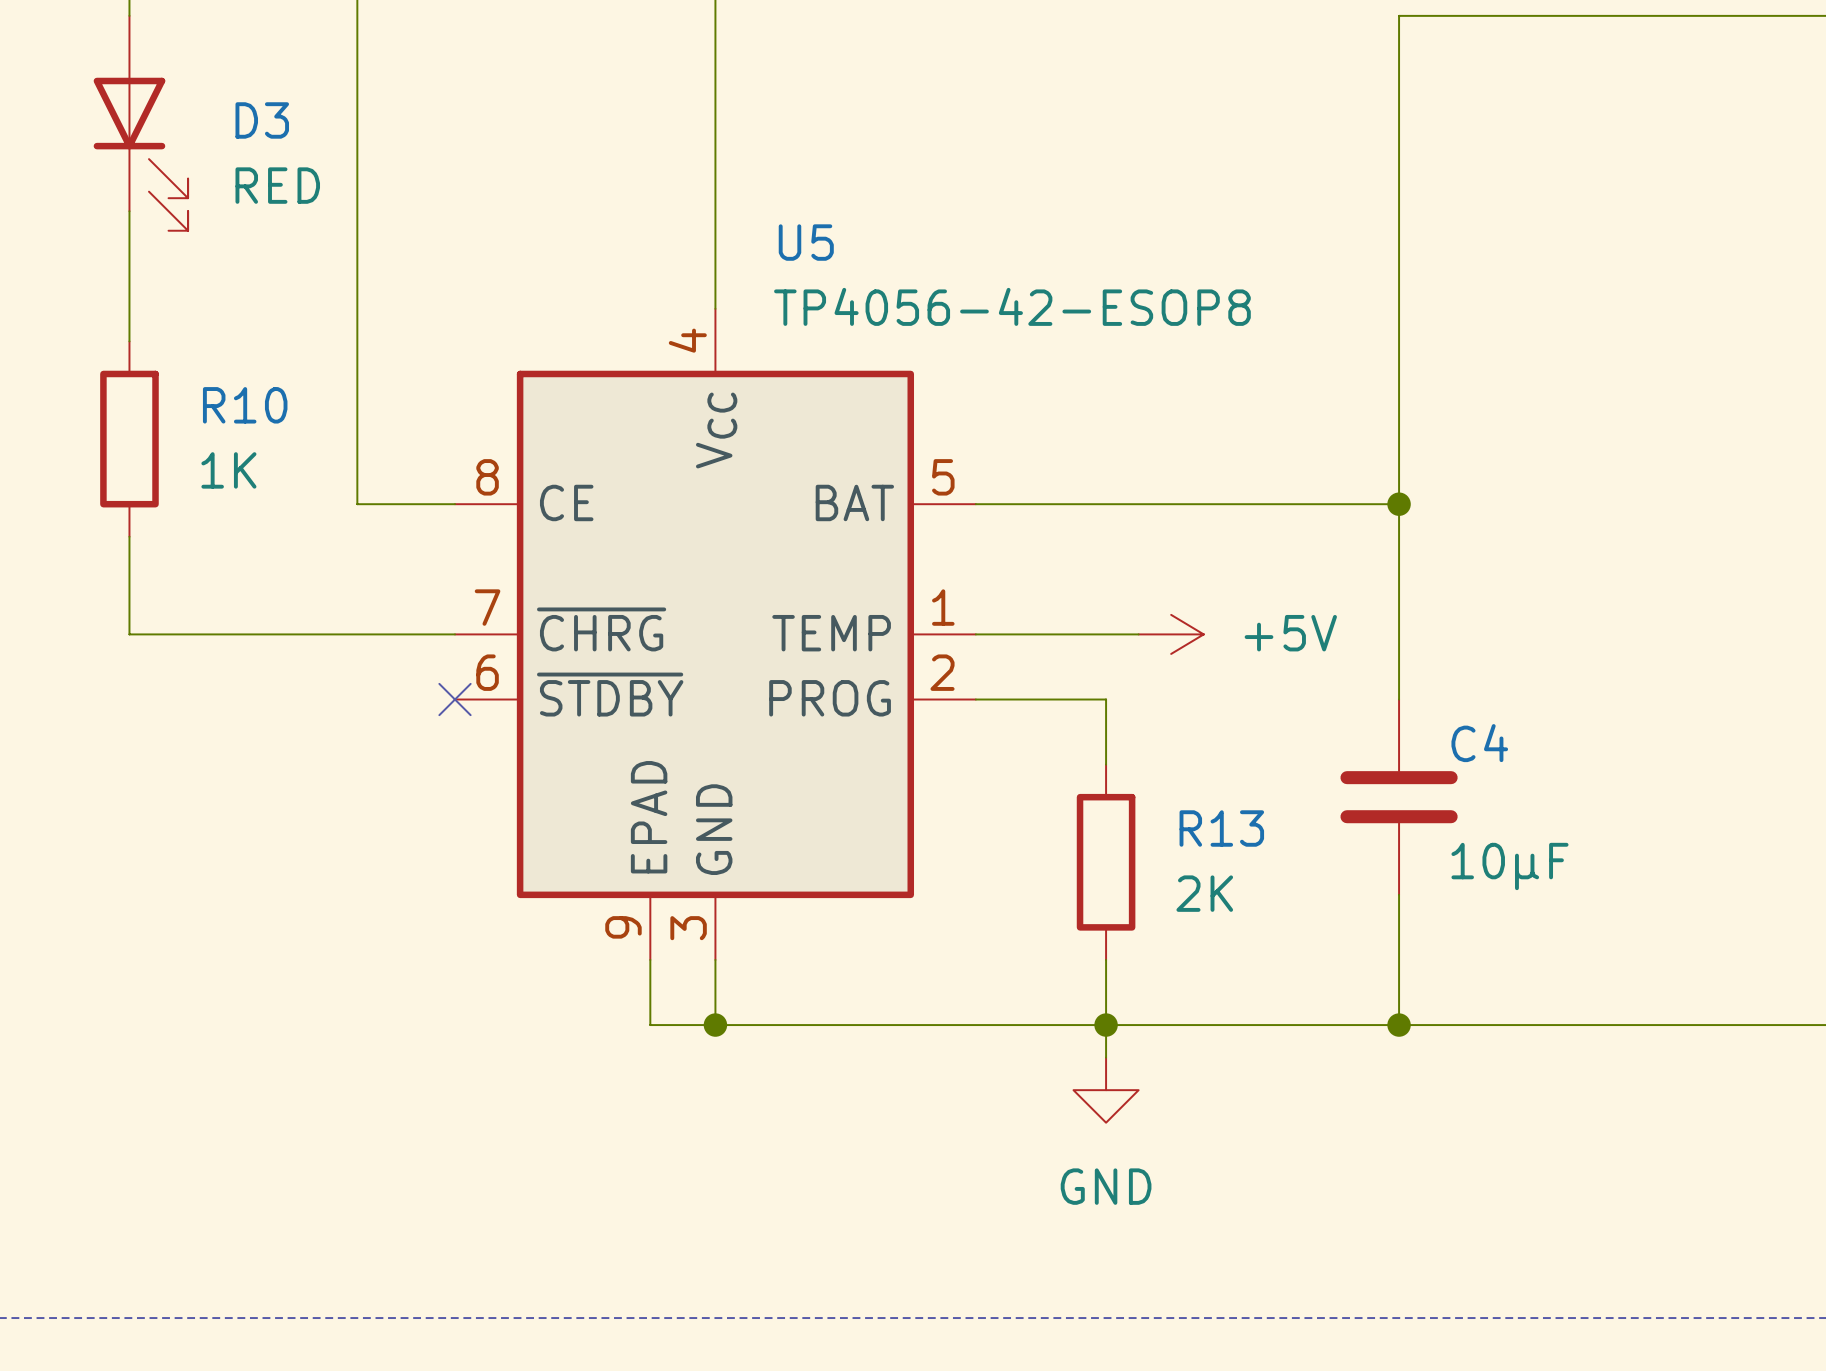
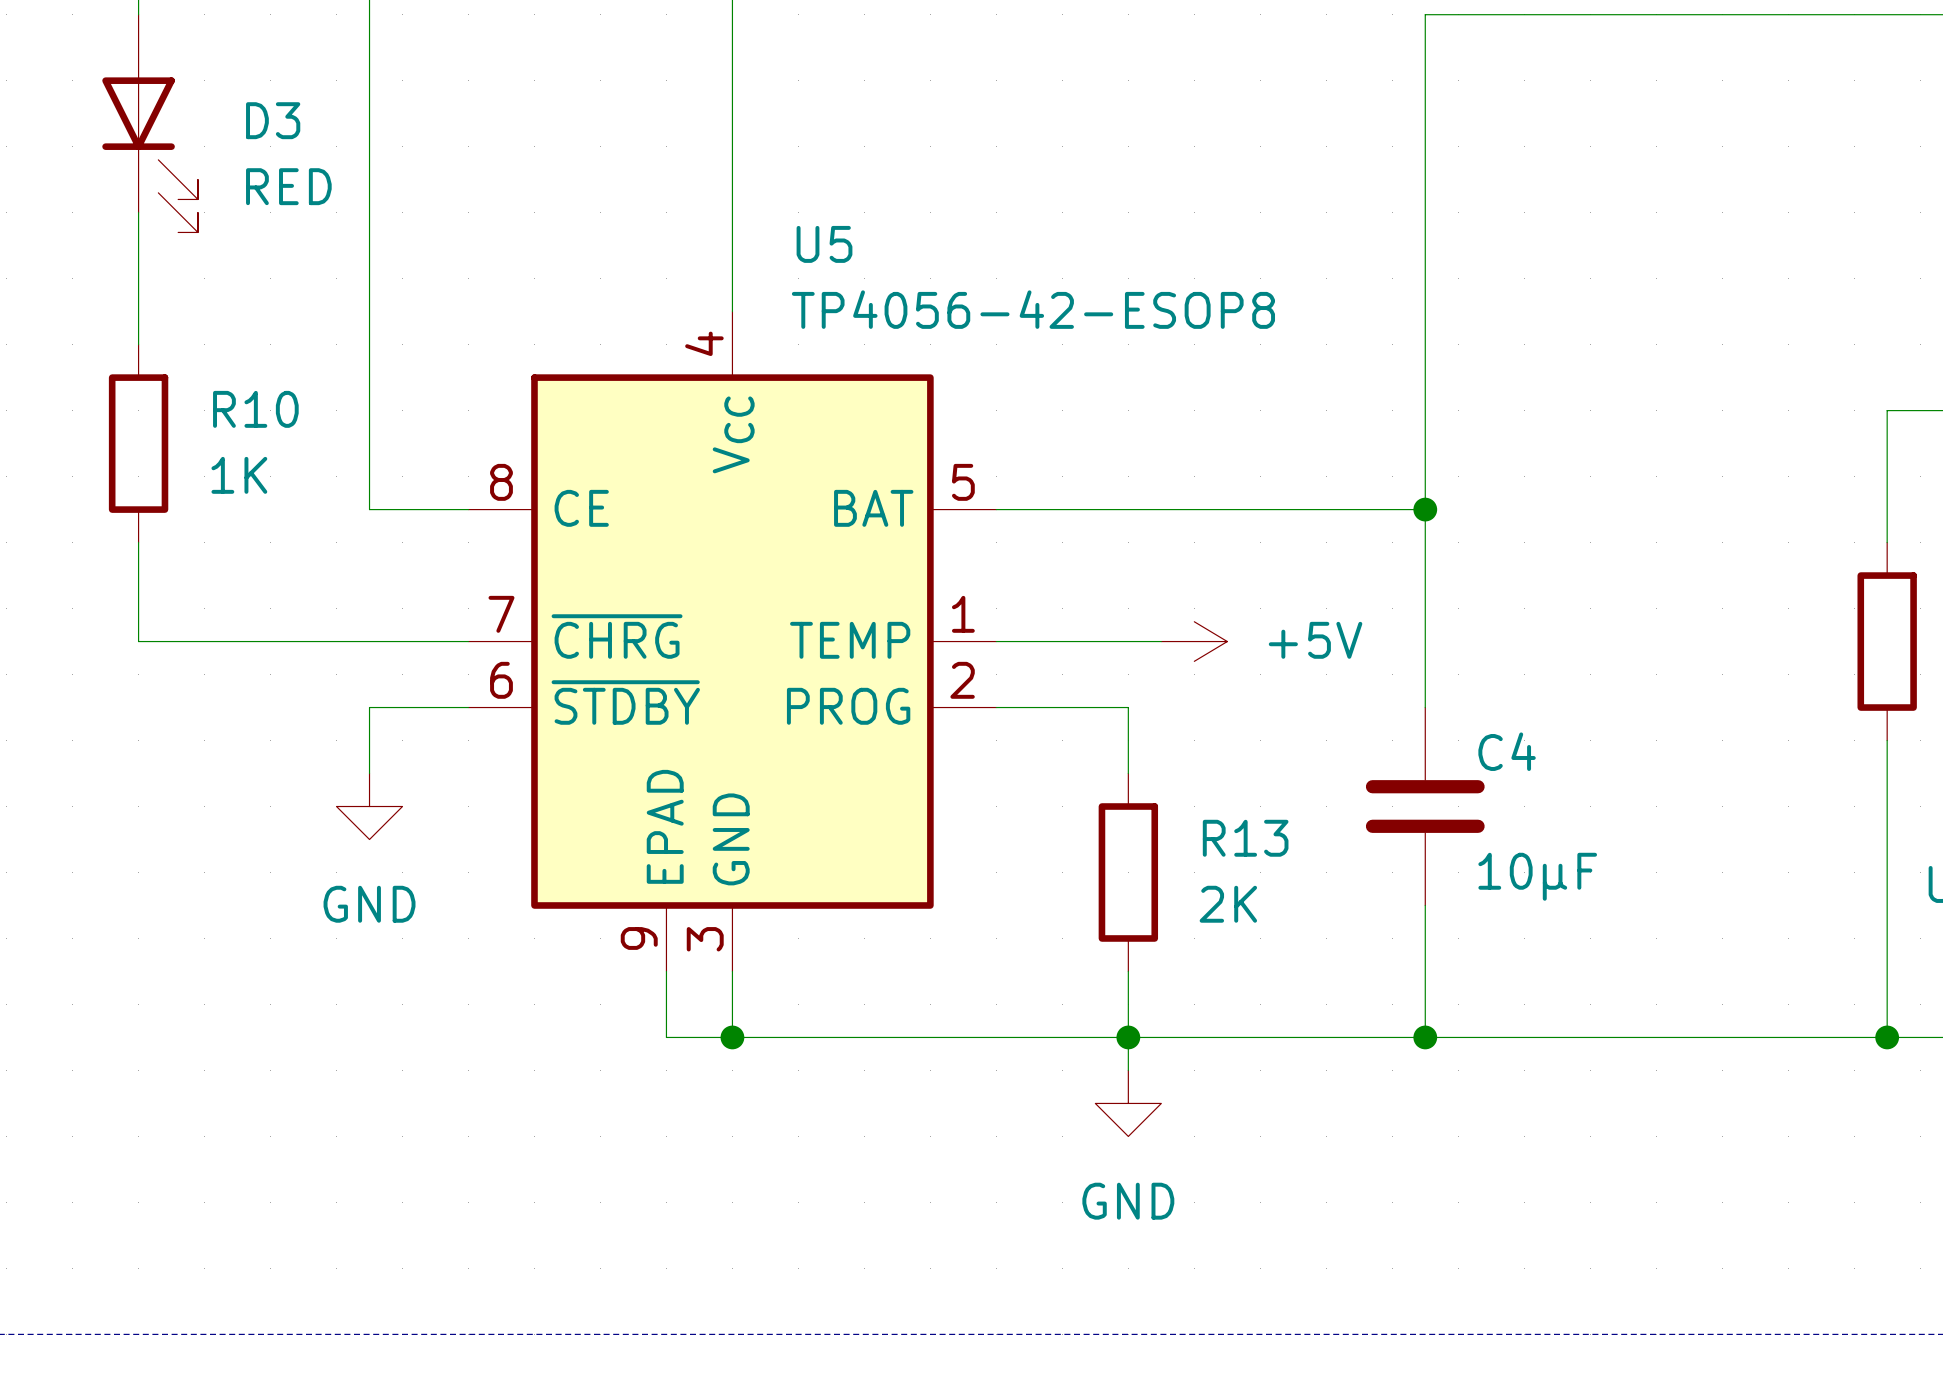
wire: none -> (468, 707) (369, 707) (369, 773)
no-connect mark: (455, 699) -> none
power symbol: none -> GND (369, 806)

